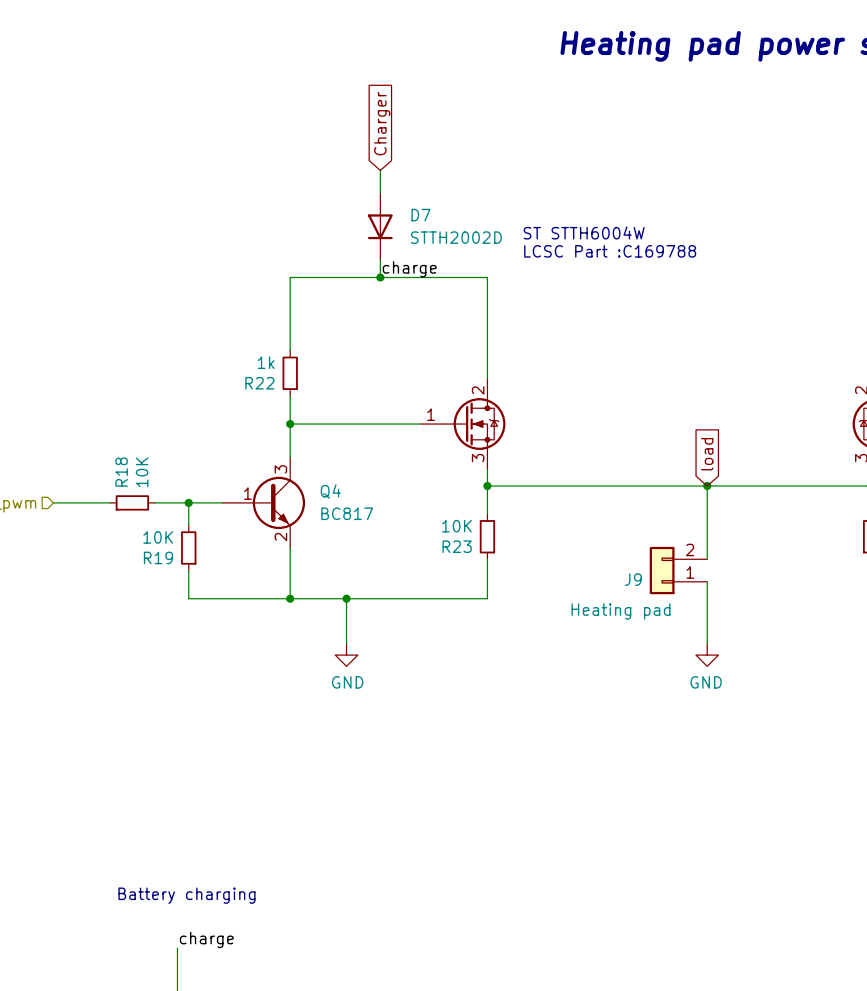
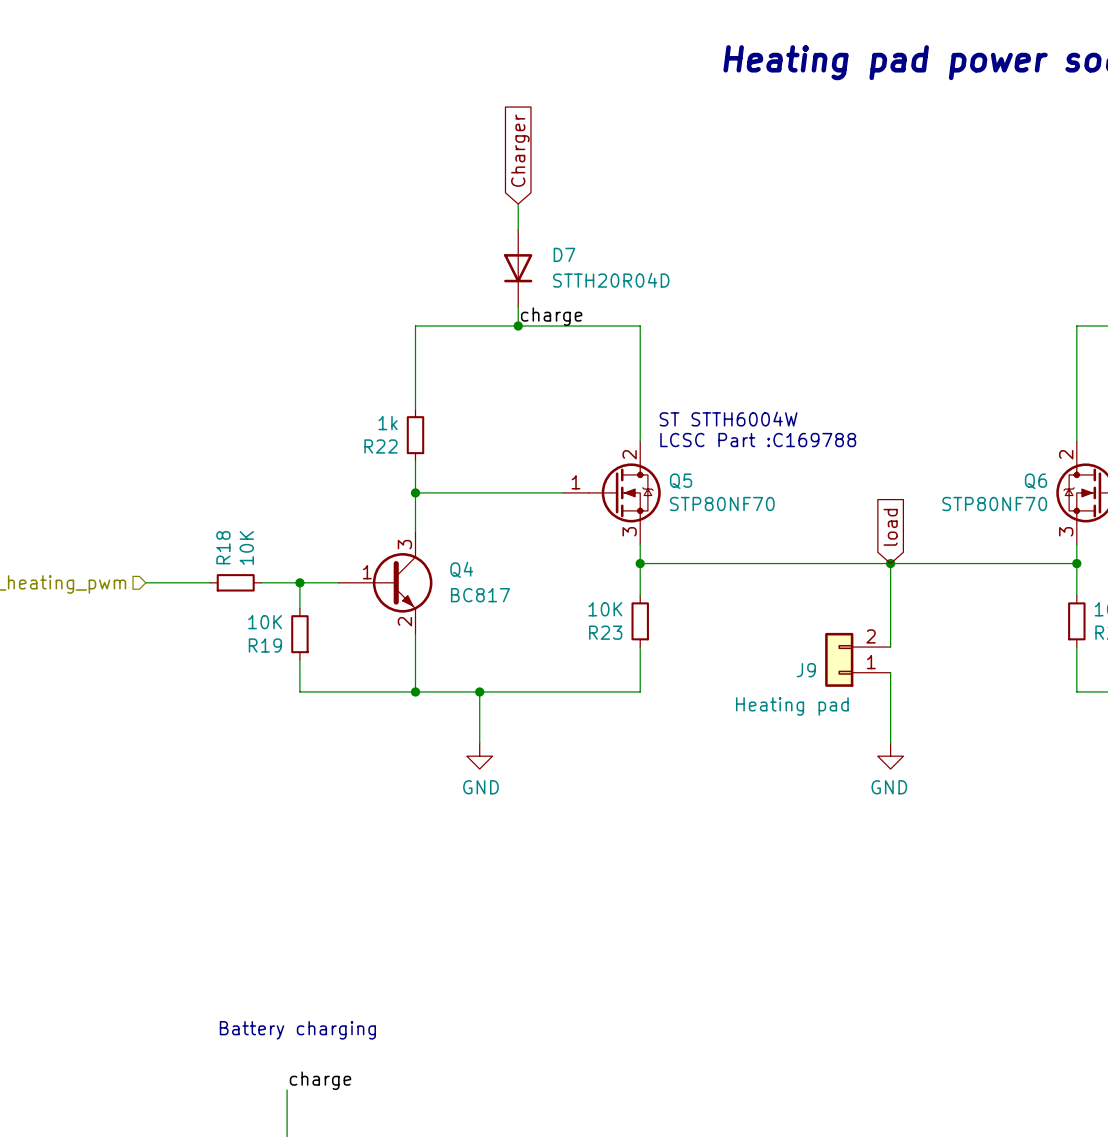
text position: ST STTH6004W (584, 232) -> ST STTH6004W (728, 419)
D7 value: STTH2002D (456, 237) -> STTH20R04D (611, 280)
text position: LCSC Part :C169788 (610, 251) -> LCSC Part :C169788 (758, 440)
Q5 name: none -> Q5 (681, 481)
Q6 name: none -> Q6 (1036, 481)
Q5 value: none -> STP80NF70 (722, 504)
Q6 value: none -> STP80NF70 (994, 504)

